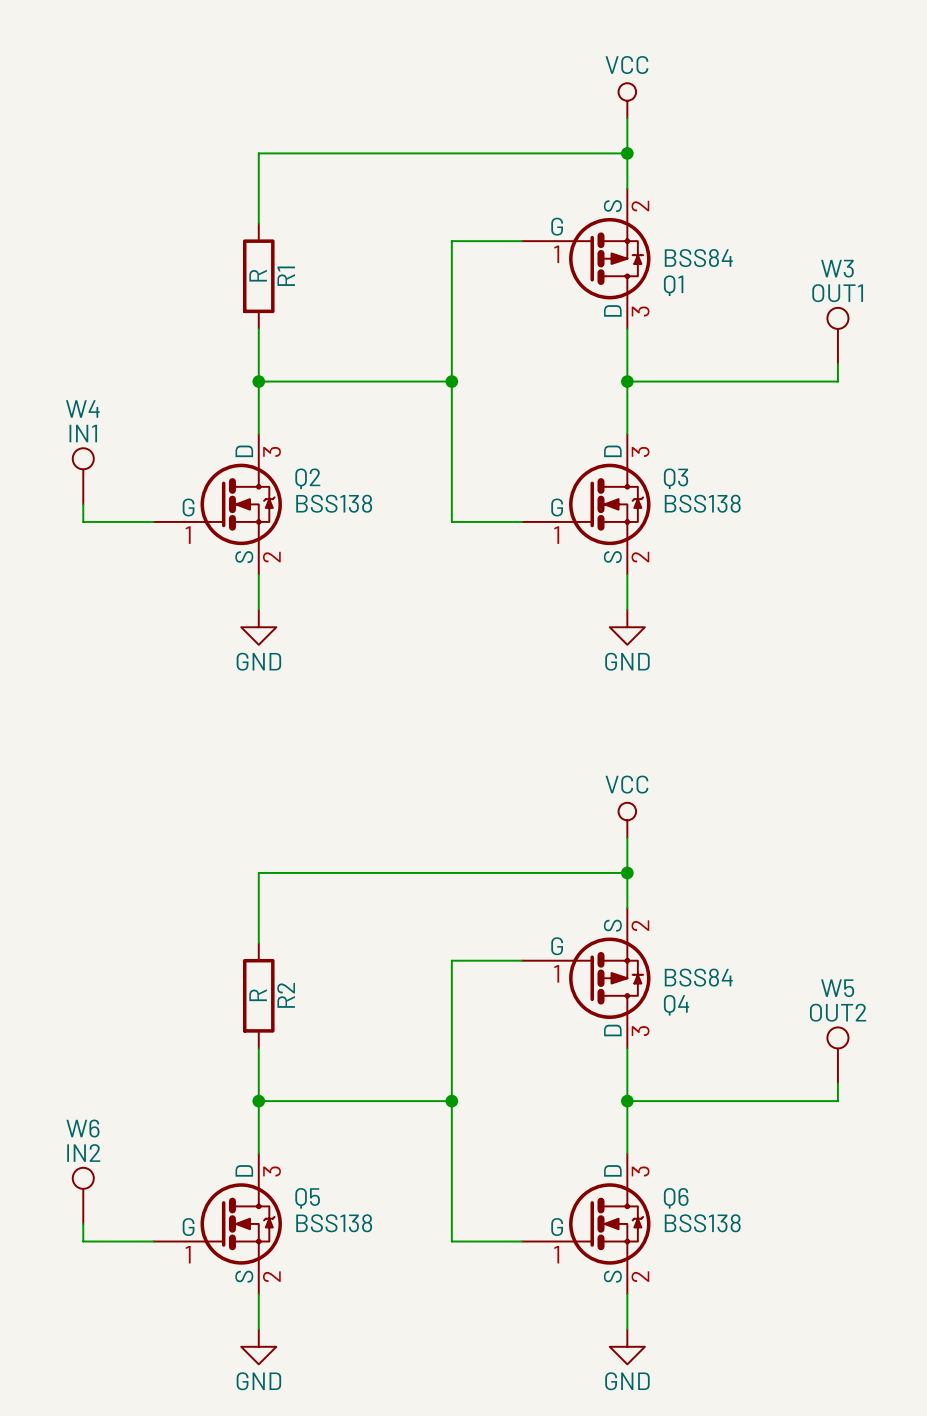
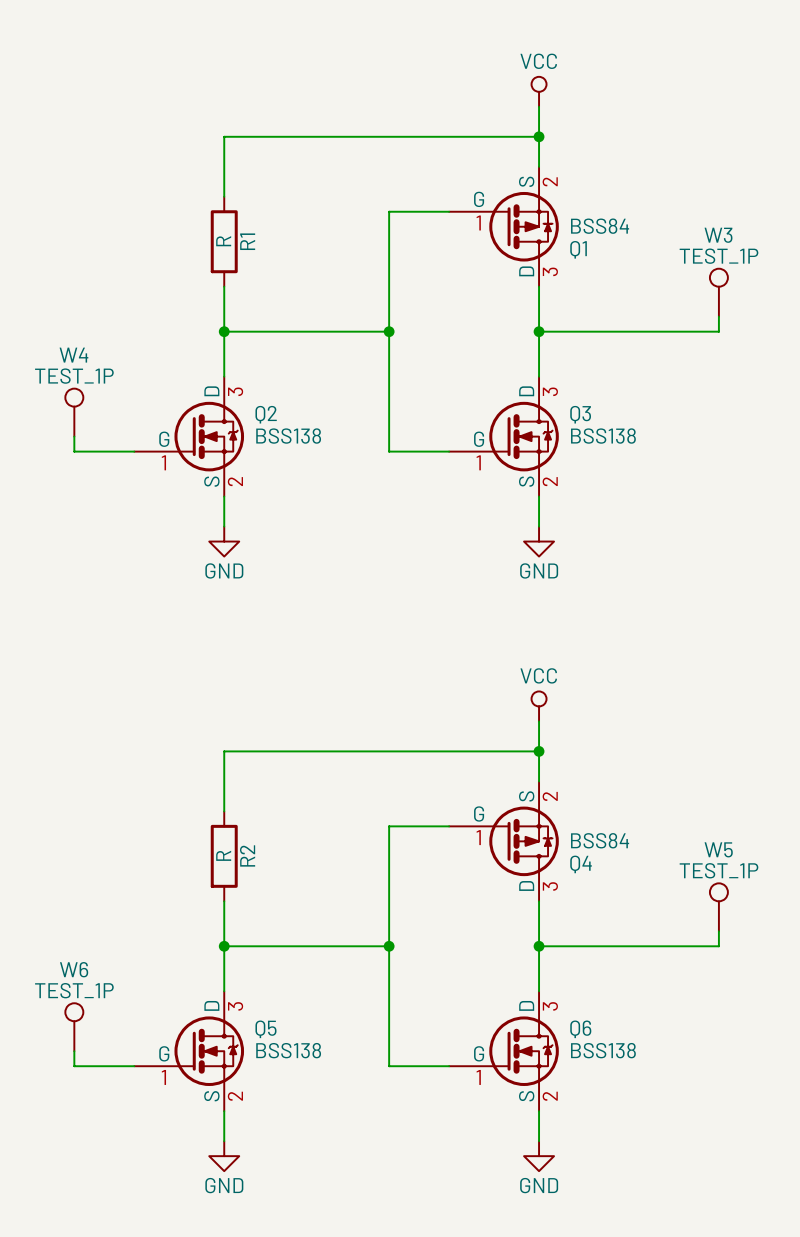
W3 value: OUT1 (837, 293) -> TEST_1P (718, 256)
W4 value: IN1 (83, 433) -> TEST_1P (74, 376)
W5 value: OUT2 (838, 1012) -> TEST_1P (718, 870)
W6 value: IN2 (83, 1153) -> TEST_1P (74, 990)

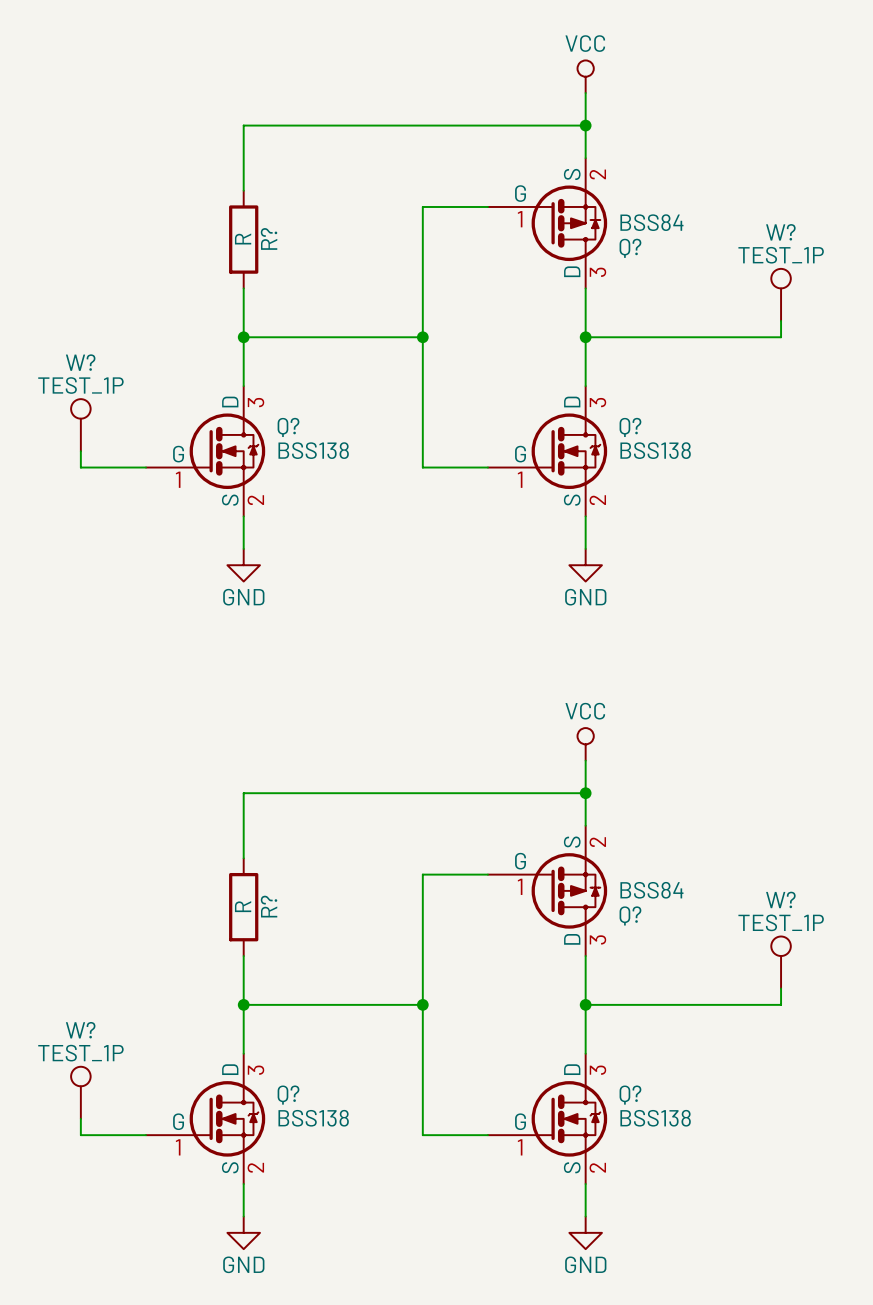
W3 name: W3 (718, 235) -> W? (780, 232)
R1 name: R1 (247, 241) -> R? (269, 238)
Q1 name: Q1 (578, 249) -> Q? (630, 248)
W4 name: W4 (73, 355) -> W? (80, 362)
Q2 name: Q2 (266, 414) -> Q? (288, 427)
Q3 name: Q3 (580, 414) -> Q? (630, 427)
W5 name: W5 (718, 849) -> W? (780, 899)
R2 name: R2 (247, 855) -> R? (269, 906)
Q4 name: Q4 (581, 864) -> Q? (630, 915)
W6 name: W6 (74, 969) -> W? (80, 1030)
Q5 name: Q5 (265, 1029) -> Q? (288, 1095)
Q6 name: Q6 (580, 1029) -> Q? (630, 1095)

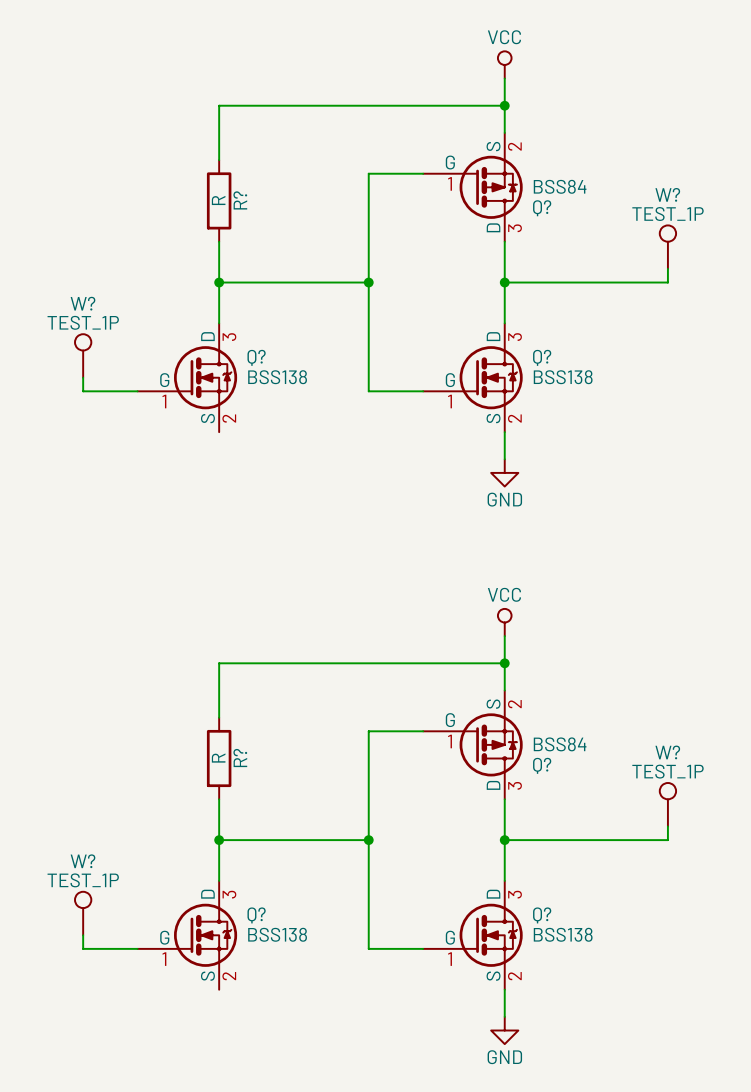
wire: (243, 516) (243, 548) -> none
power symbol: GND (243, 565) -> none
wire: (243, 1184) (243, 1216) -> none
power symbol: GND (243, 1232) -> none

